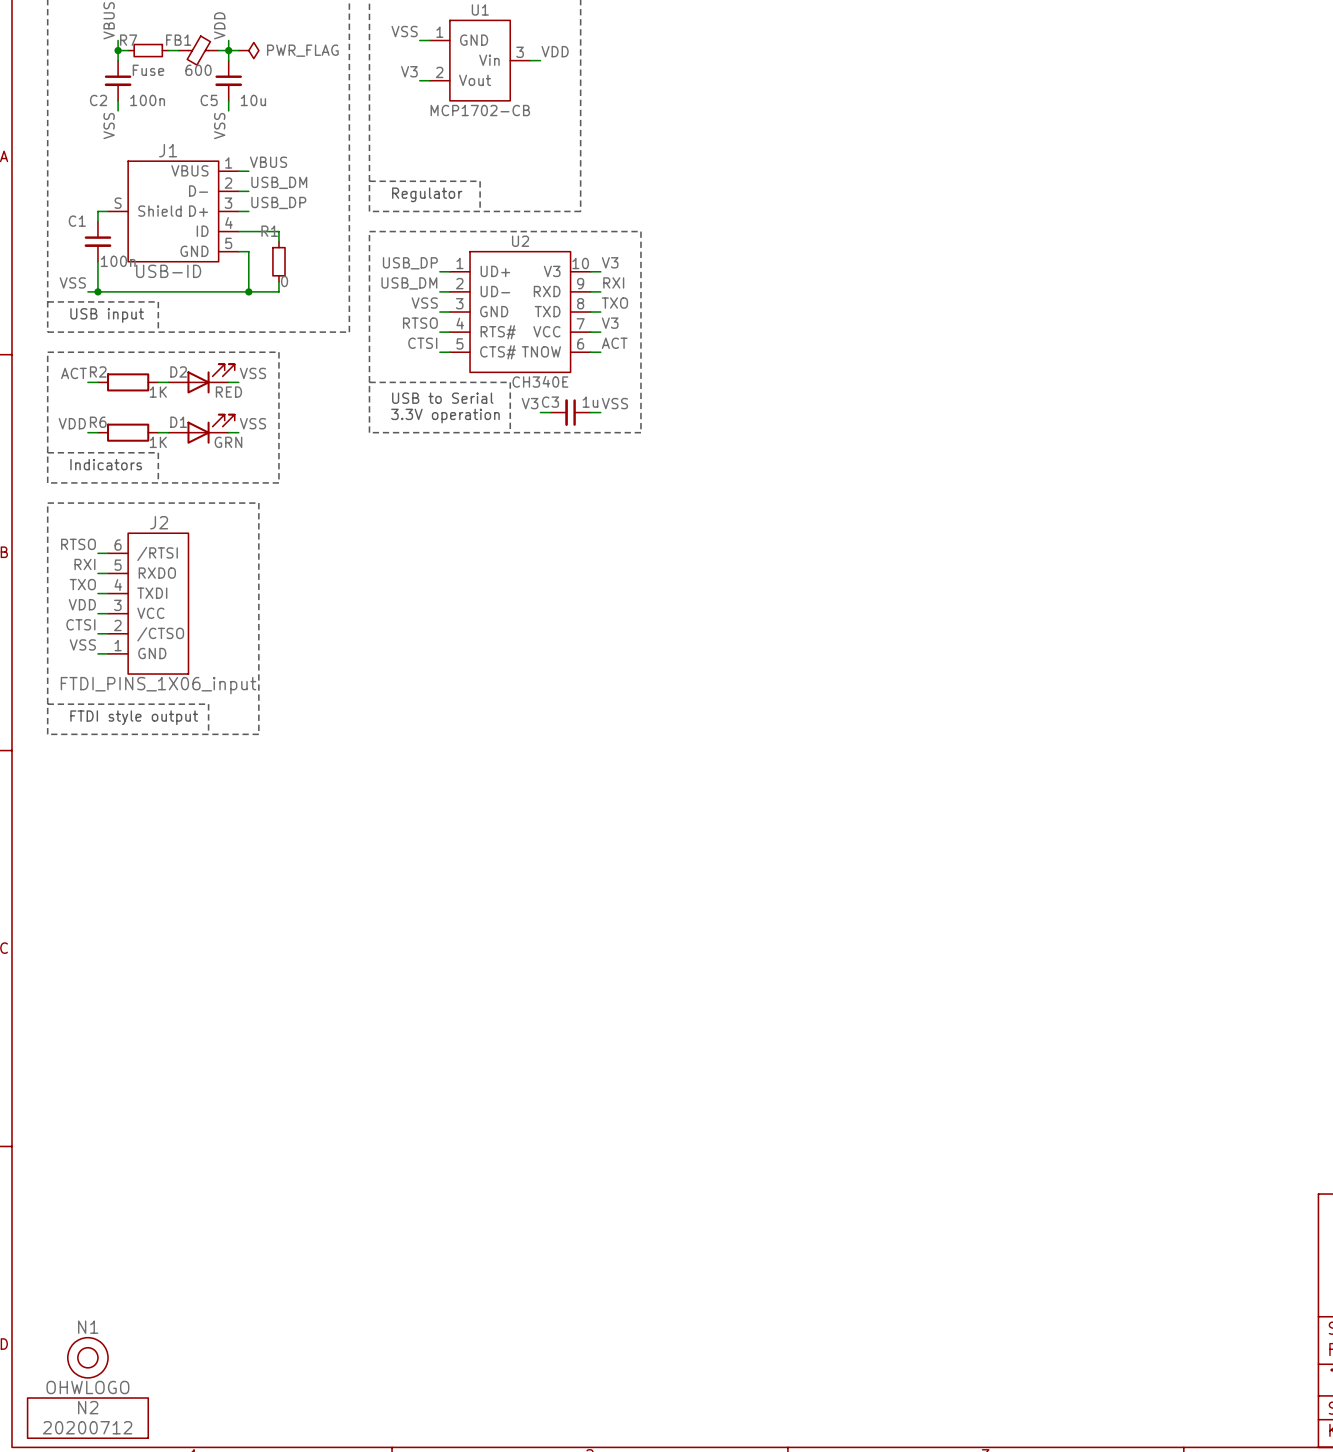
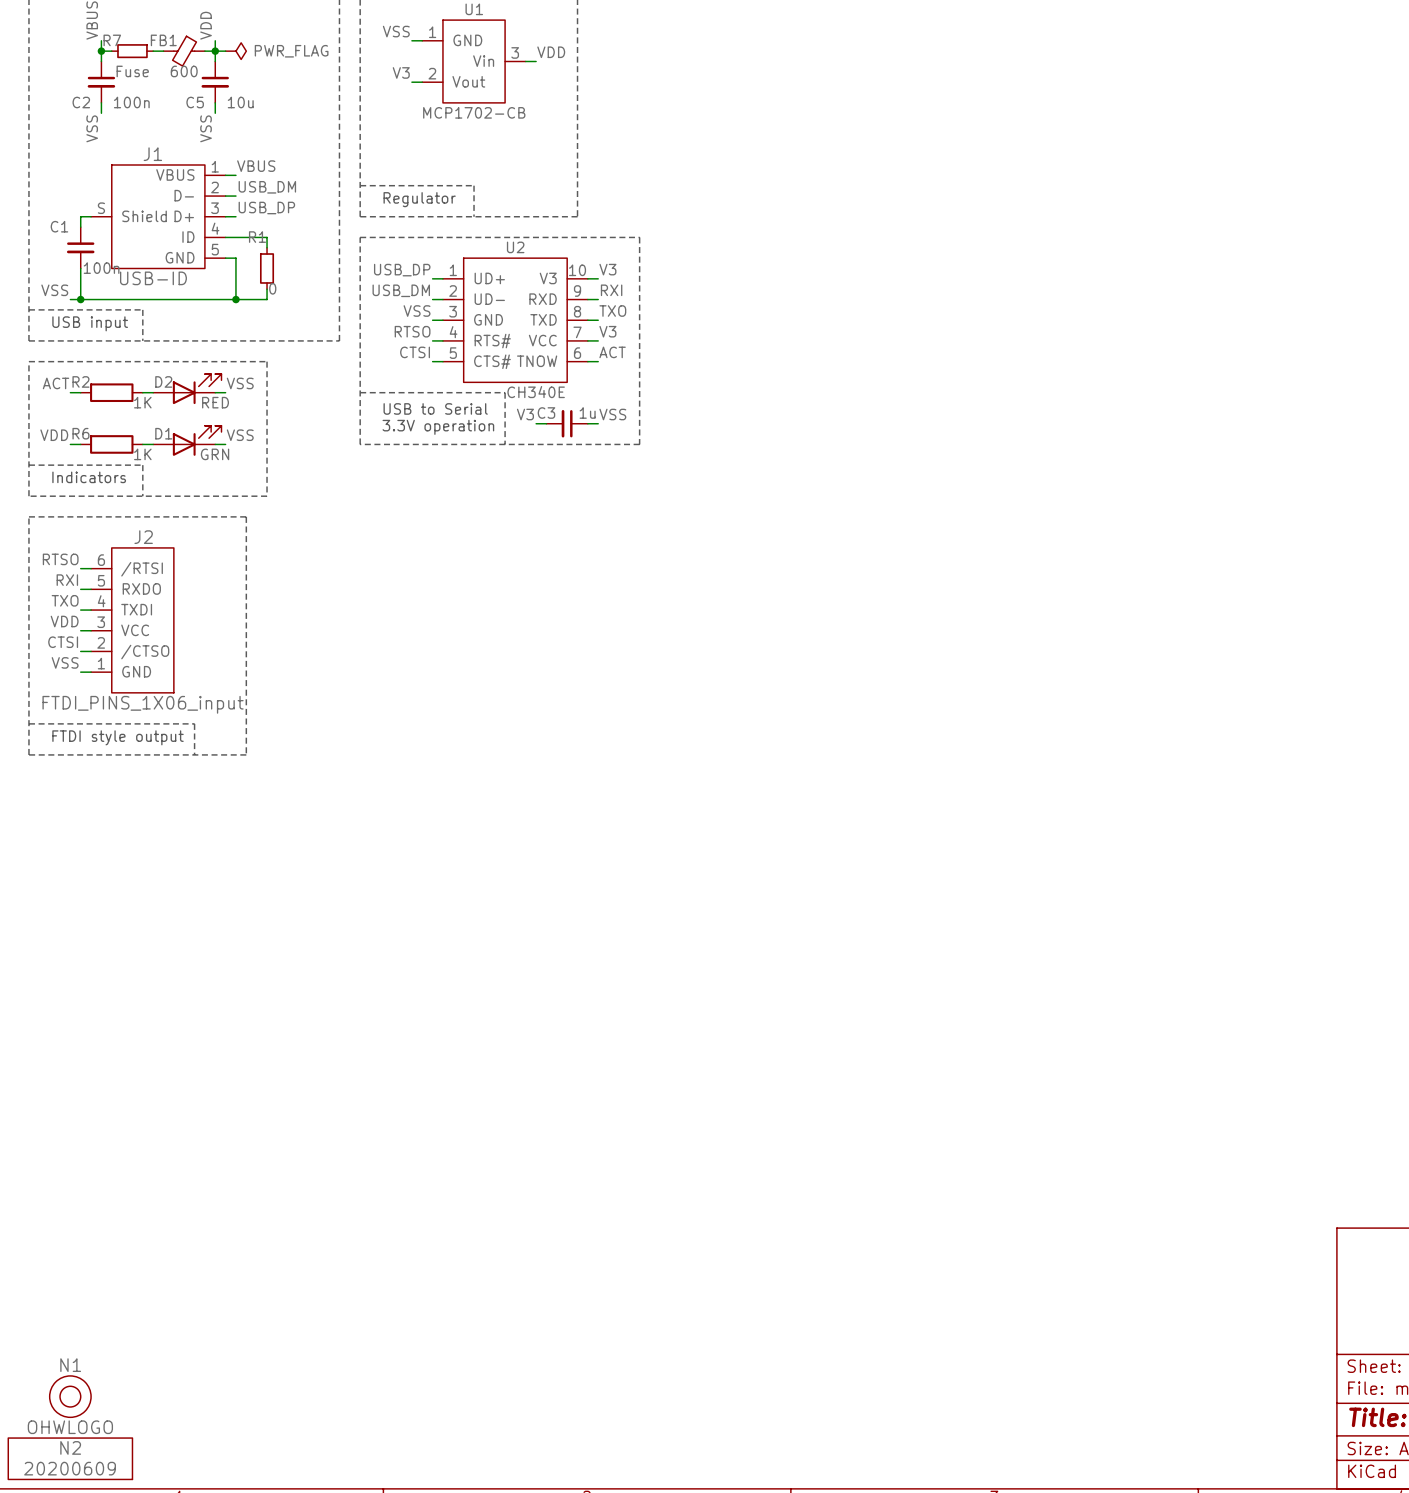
N2 value: 20200712 (87, 1427) -> 20200609 (70, 1468)

